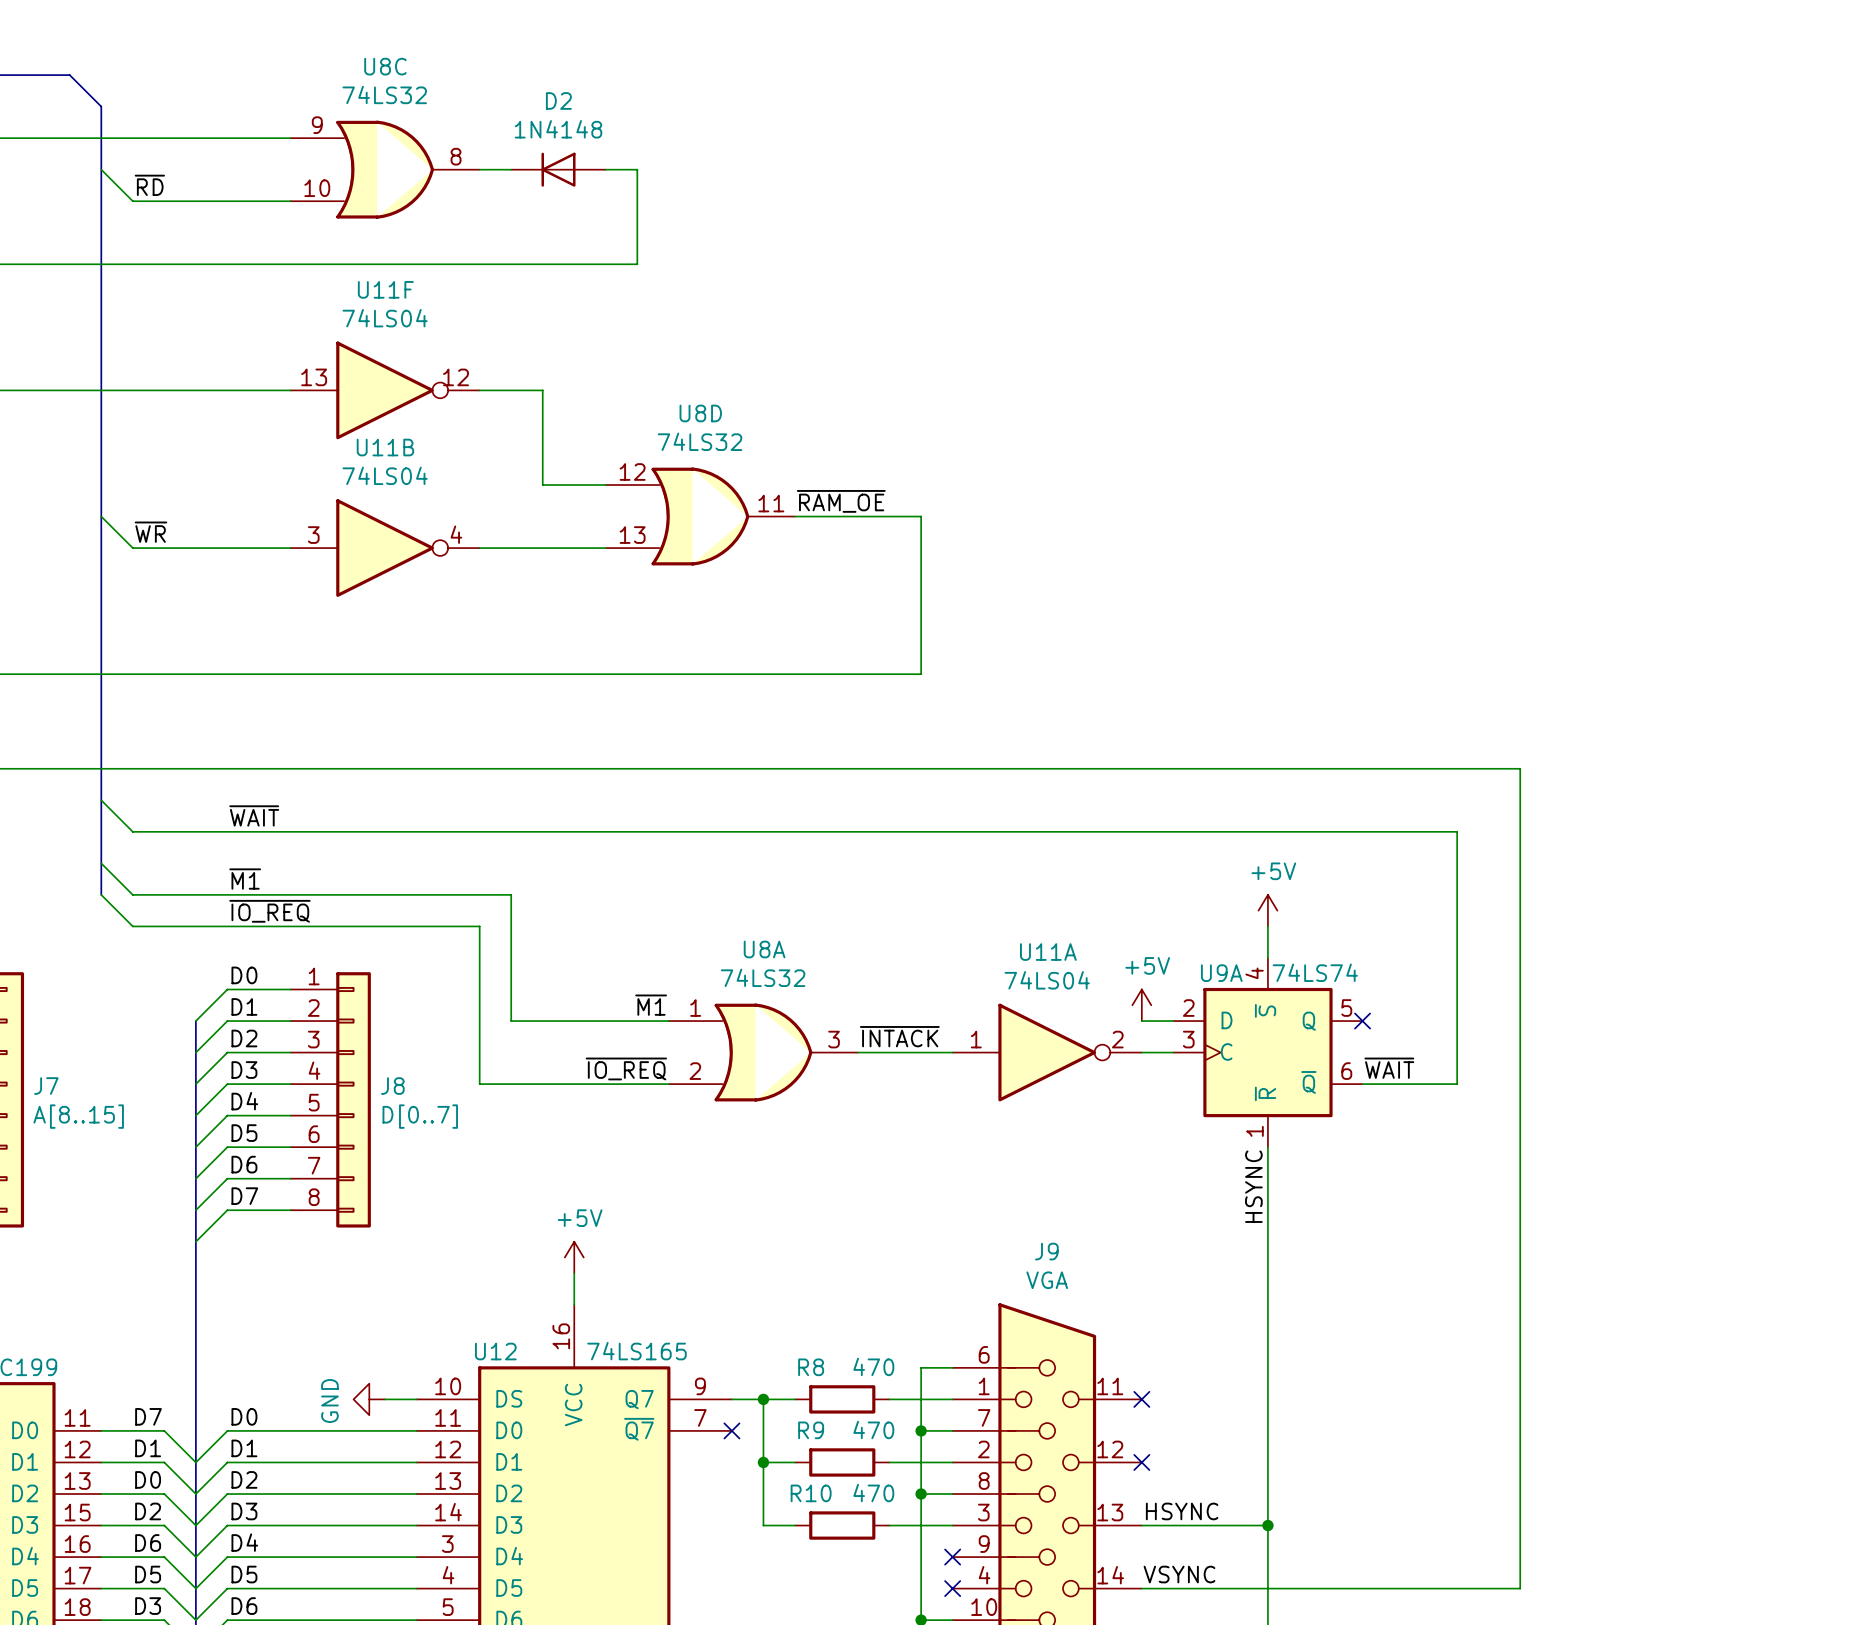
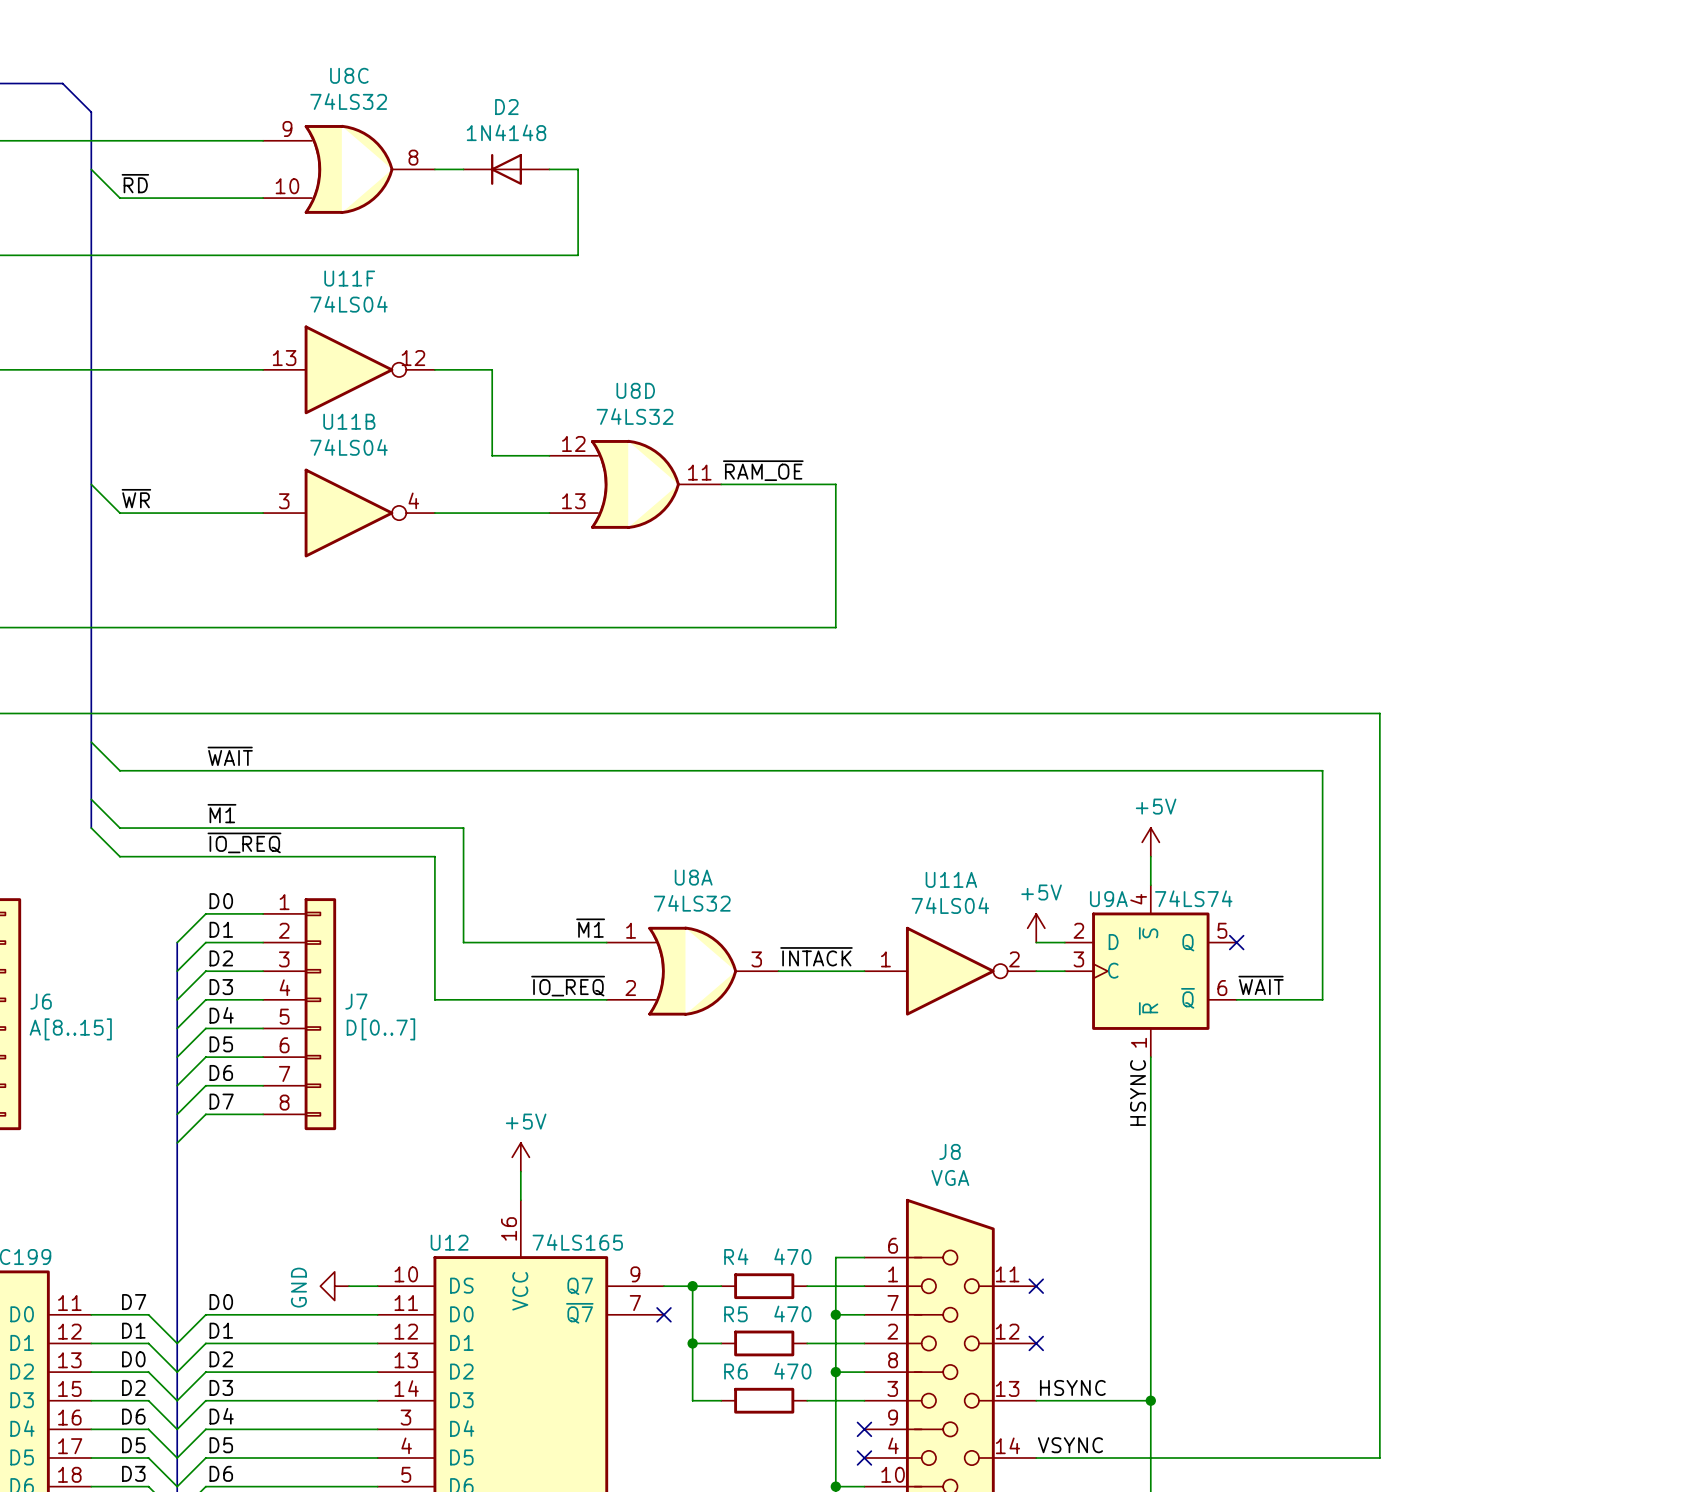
J7 name: J7 (46, 1086) -> J6 (41, 1001)
J8 name: J8 (392, 1086) -> J7 (356, 1001)
J9 name: J9 (1046, 1251) -> J8 (950, 1151)
R8 name: R8 (811, 1367) -> R4 (736, 1256)
R9 name: R9 (811, 1430) -> R5 (735, 1314)
R10 name: R10 (811, 1493) -> R6 (735, 1371)

